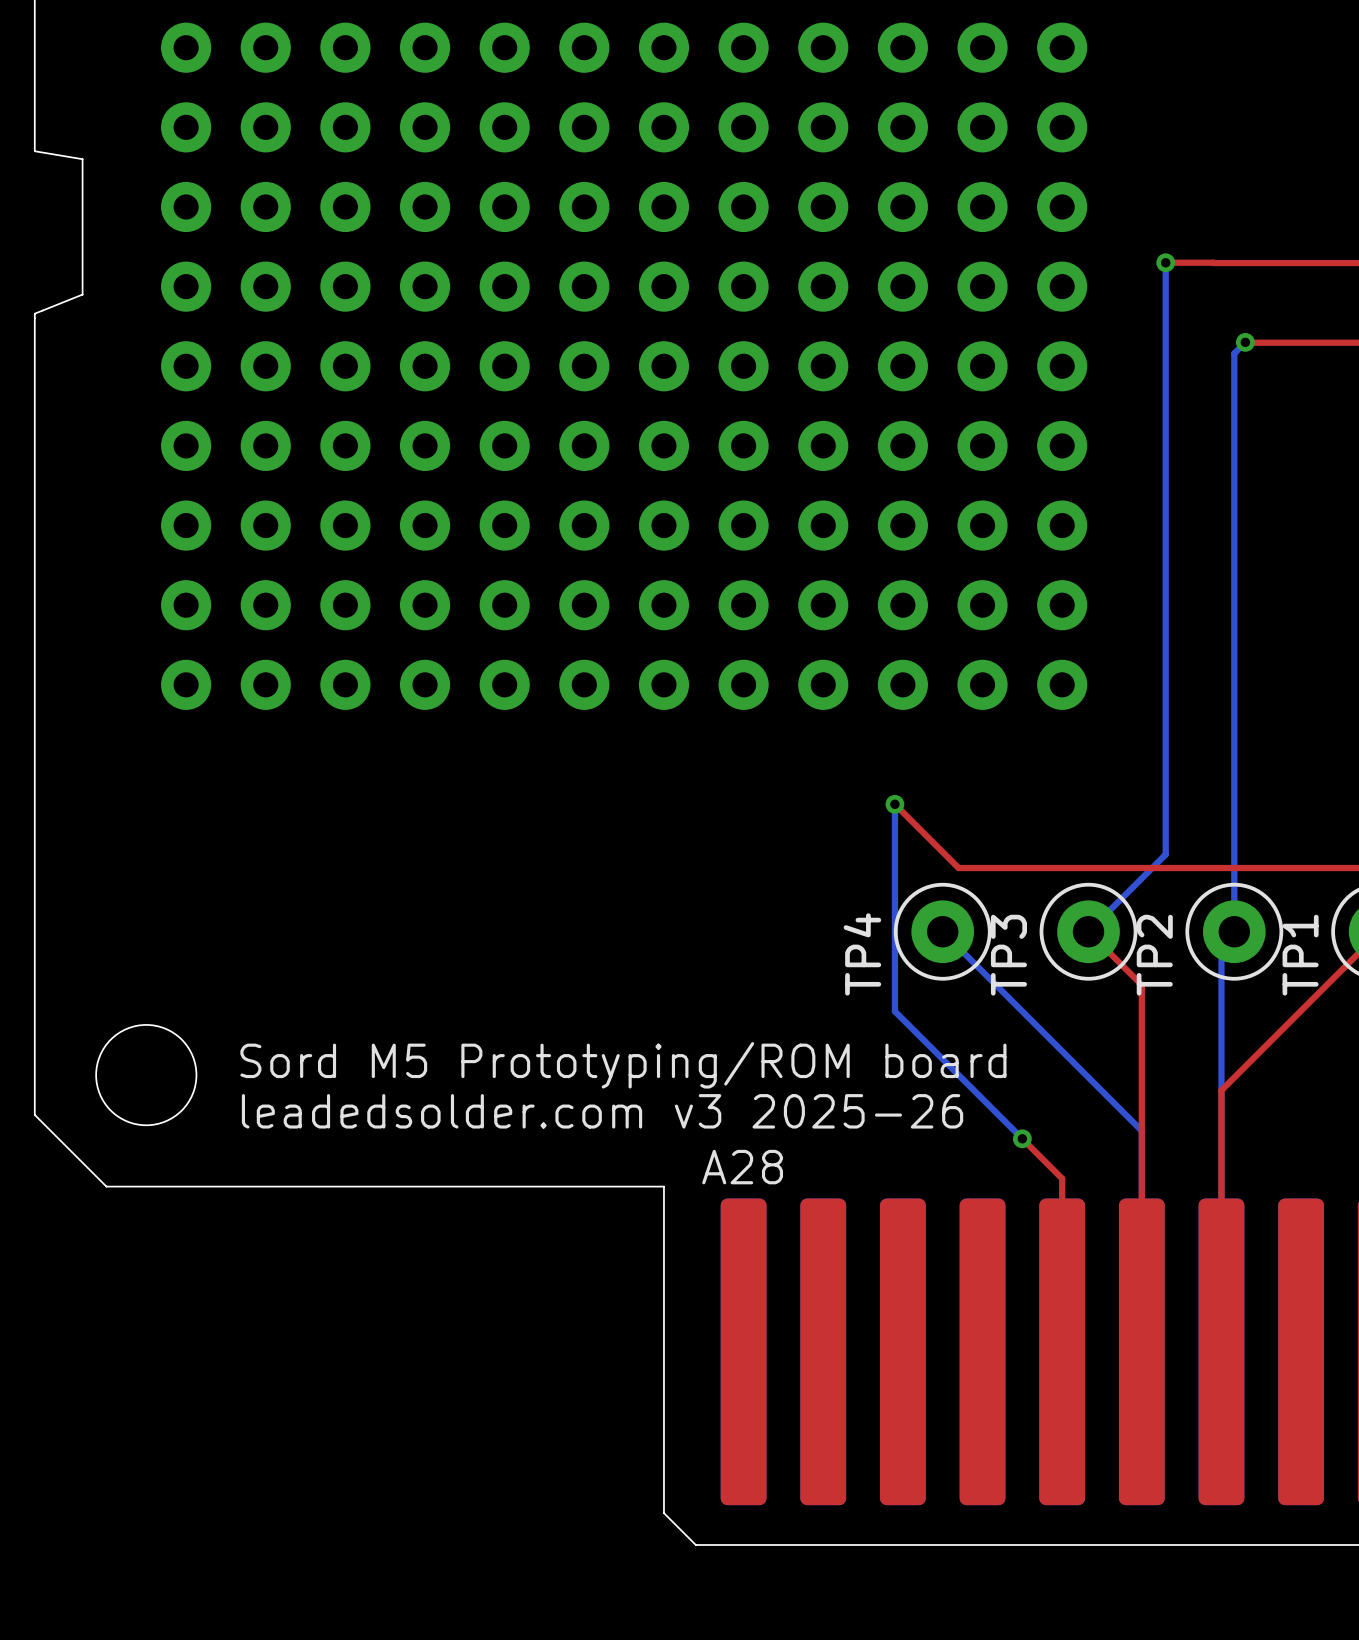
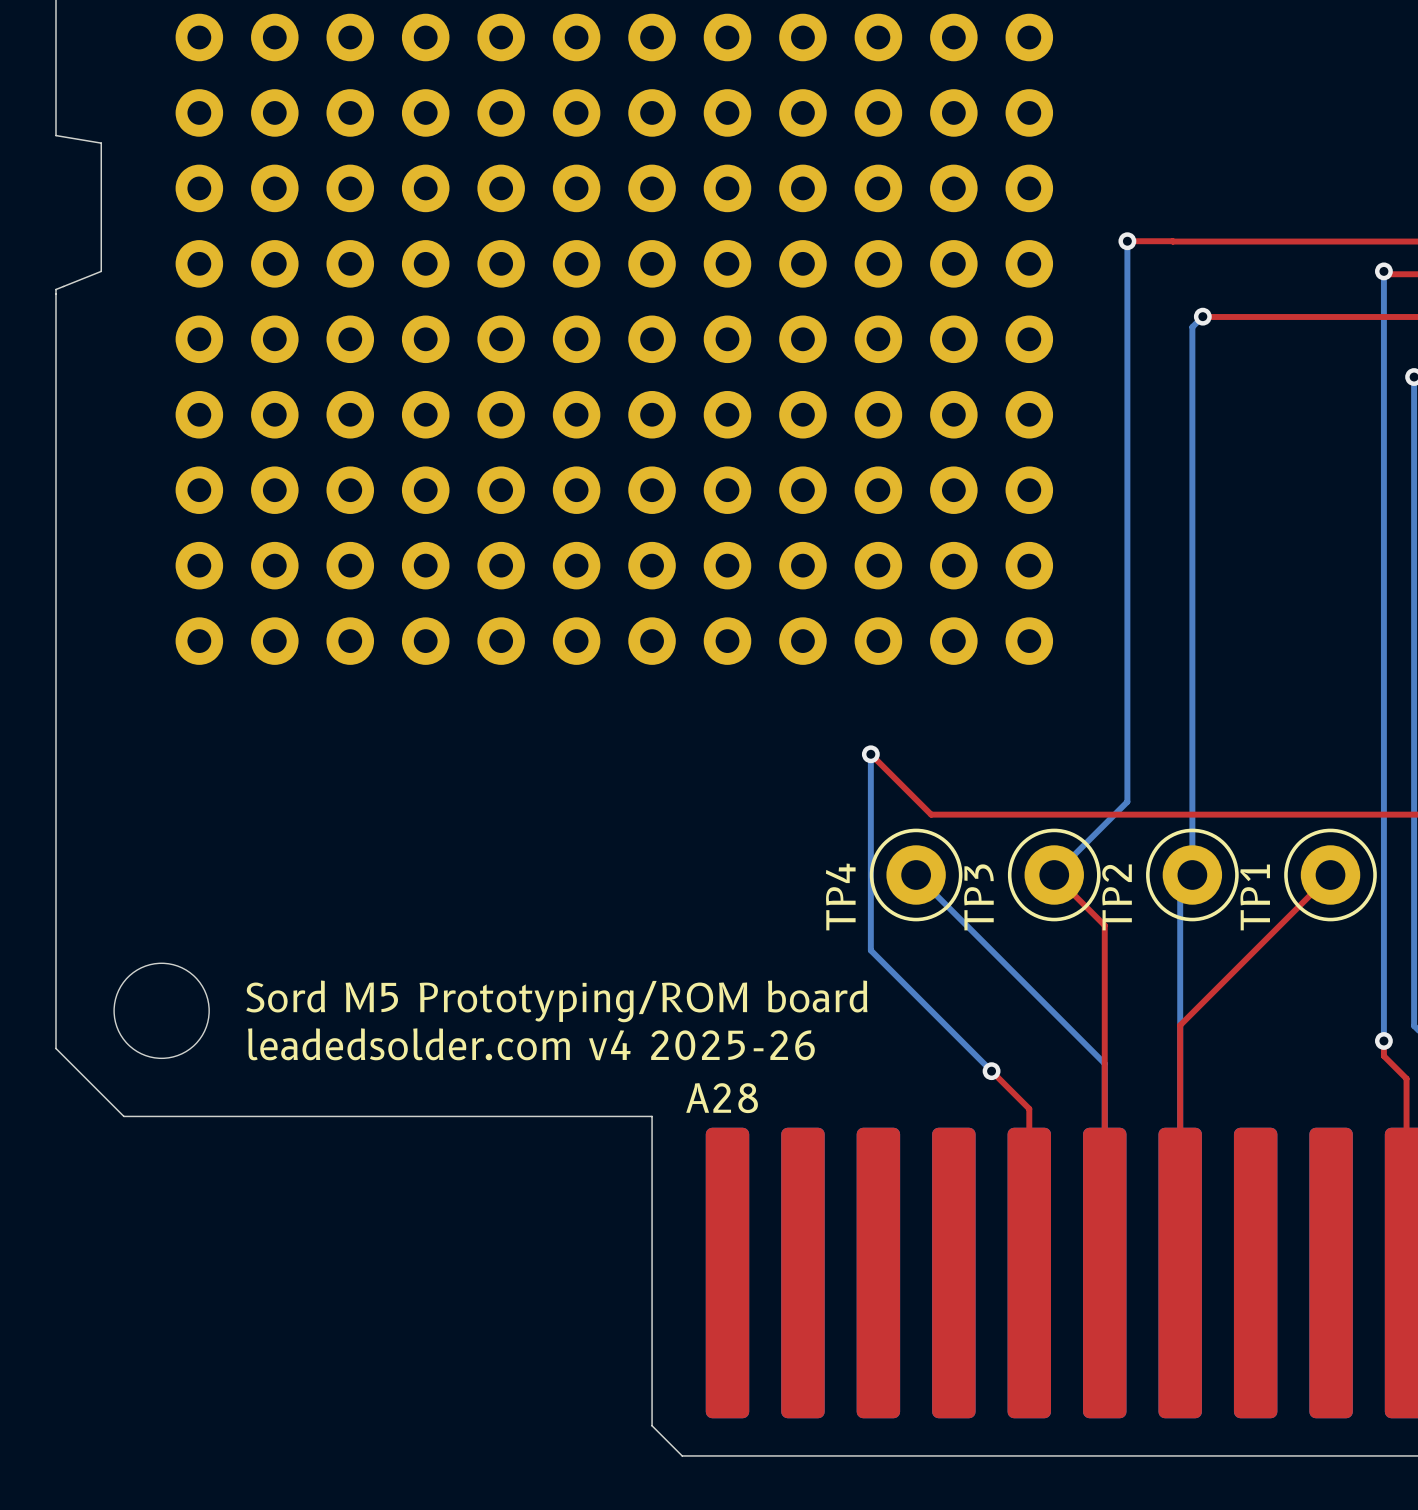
text: leadedsolder.com v3 2025-26 (602, 1111) -> leadedsolder.com v4 2025-26 (531, 1044)

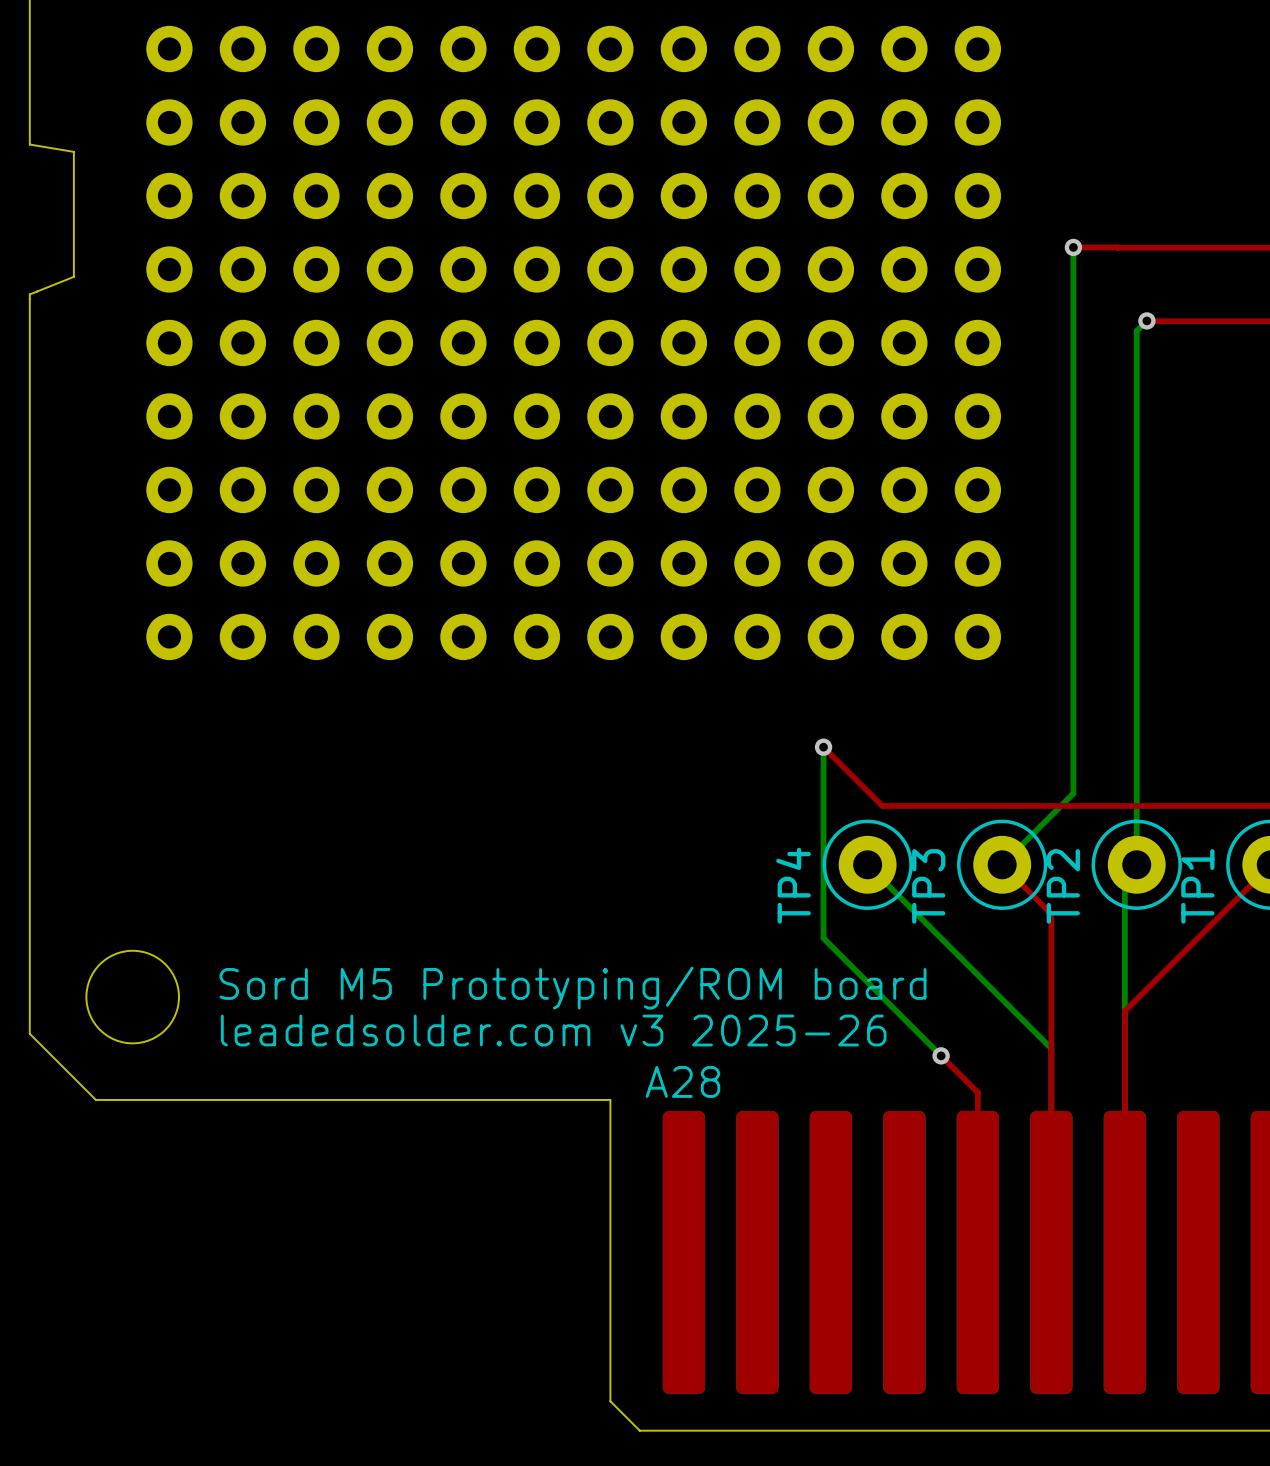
text: leadedsolder.com v4 2025-26 (531, 1044) -> leadedsolder.com v3 2025-26 (553, 1030)

